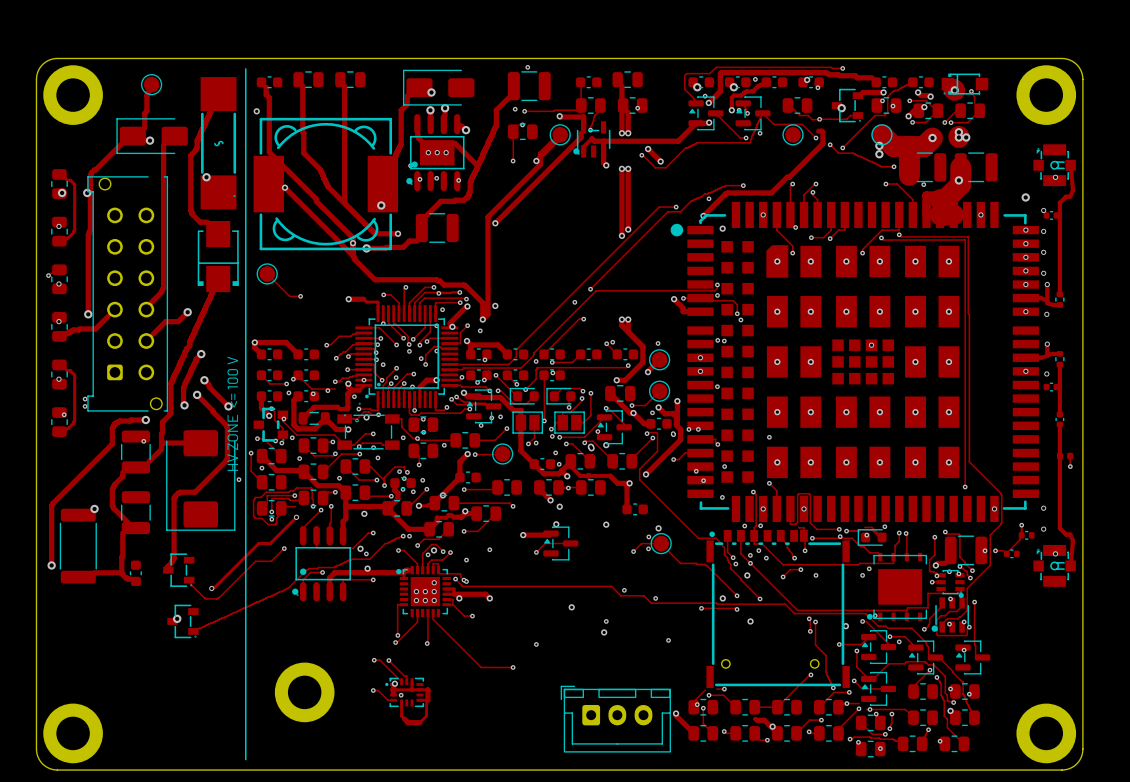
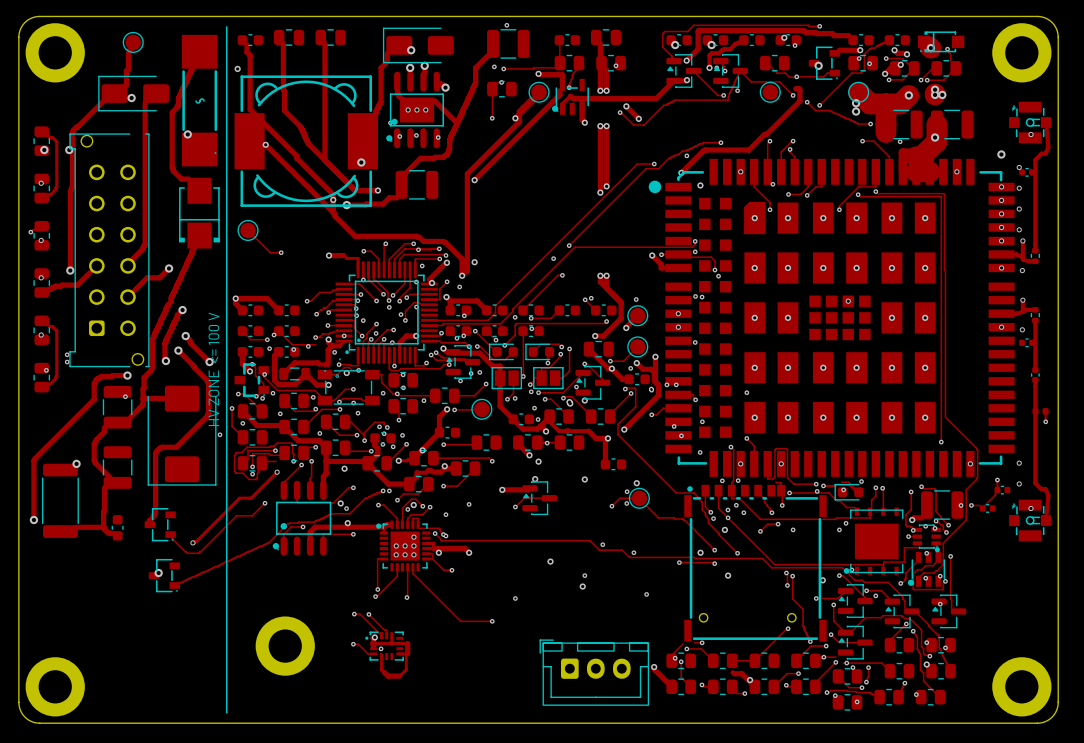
via: (755, 79) -> none
via: (705, 96) -> none

